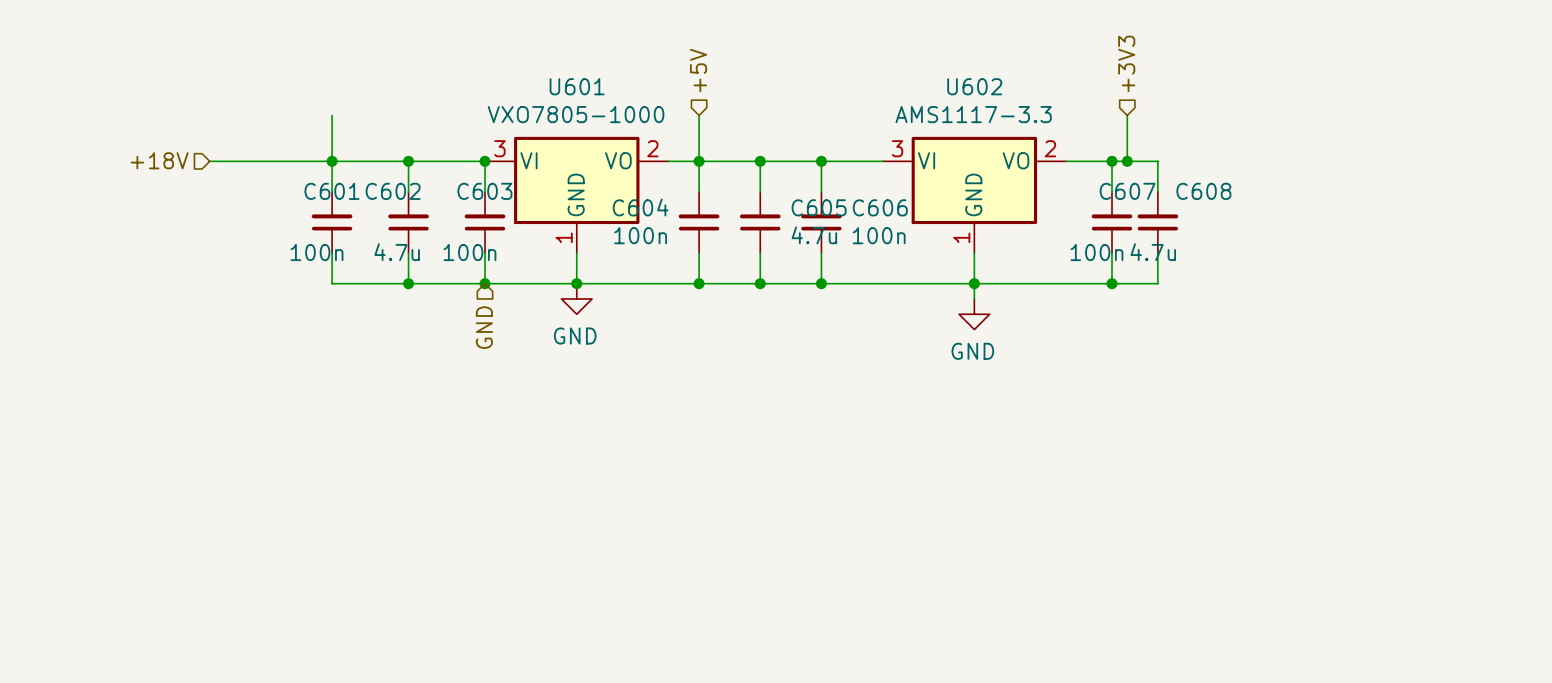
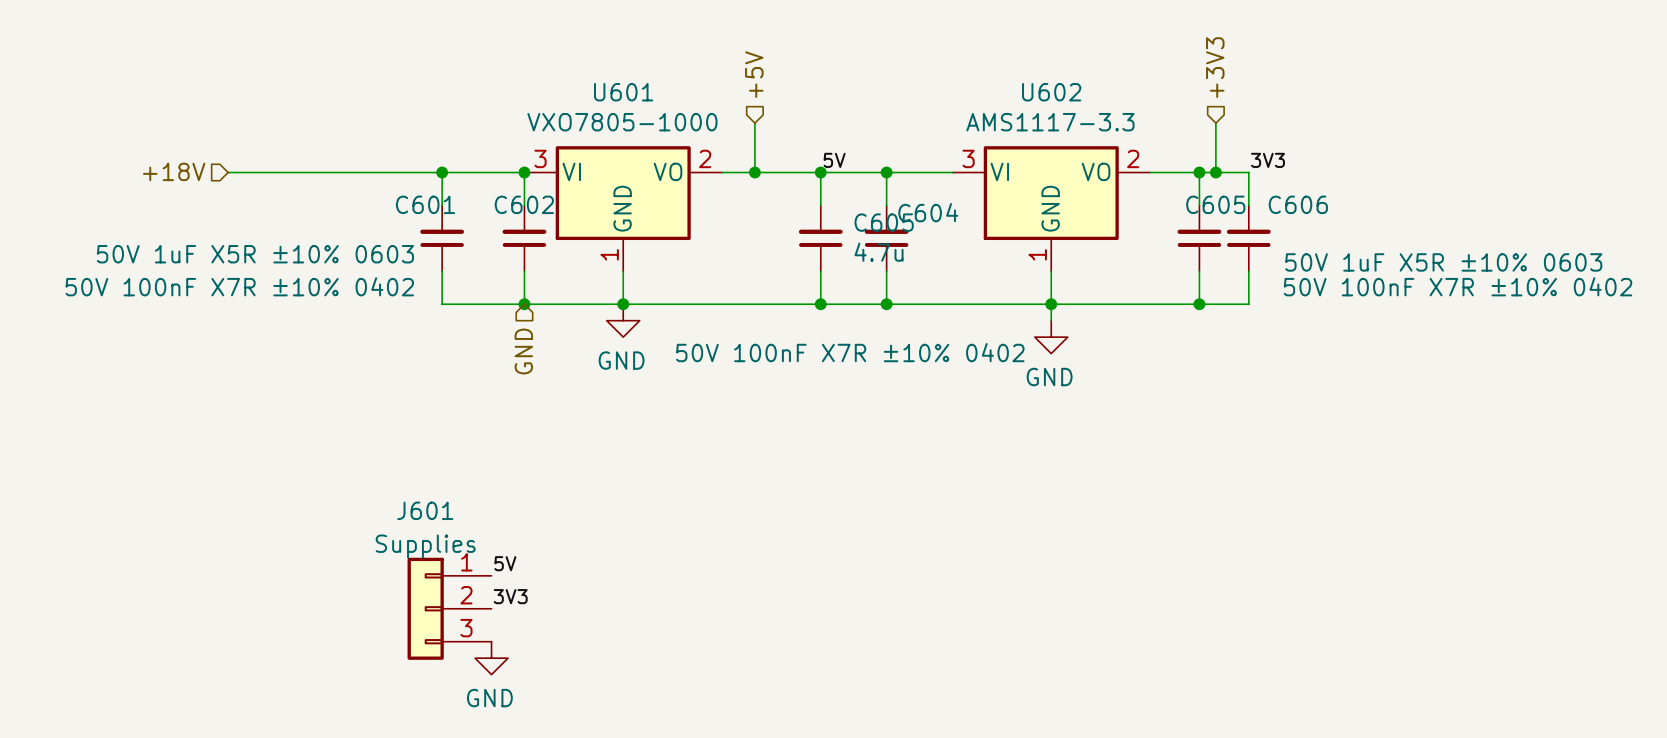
wire: (332, 115) (332, 191) -> none
label: none -> 5V (834, 160)
label: none -> 3V3 (1267, 160)
junction: (332, 161) -> none
wire: (699, 161) (699, 191) -> none
C602 name: C602 (393, 191) -> C601 (425, 204)
C603 name: C603 (484, 191) -> C602 (524, 204)
C607 name: C607 (1127, 191) -> C605 (1215, 204)
C608 name: C608 (1203, 191) -> C606 (1298, 204)
C606 name: C606 (880, 207) -> C604 (928, 212)
C601: 100n (332, 222) -> none
C604: 100n (699, 222) -> none
C606 value: 100n (879, 235) -> 50V 100nF X7R ±10% 0402 (850, 352)
C602 value: 4.7u (397, 252) -> 50V 1uF X5R ±10% 0603 (255, 254)
C603 value: 100n (469, 252) -> 50V 100nF X7R ±10% 0402 (239, 286)
C607 value: 100n (1096, 252) -> 50V 100nF X7R ±10% 0402 (1458, 286)
C608 value: 4.7u (1153, 252) -> 50V 1uF X5R ±10% 0603 (1443, 262)
wire: (332, 253) (332, 283) (408, 283) -> none
wire: (699, 253) (699, 283) -> none
junction: (408, 283) -> none
junction: (699, 283) -> none
label: none -> 5V (505, 563)
label: none -> 3V3 (510, 596)
J601: none -> Supplies (449, 608)
power symbol: none -> GND (491, 658)

